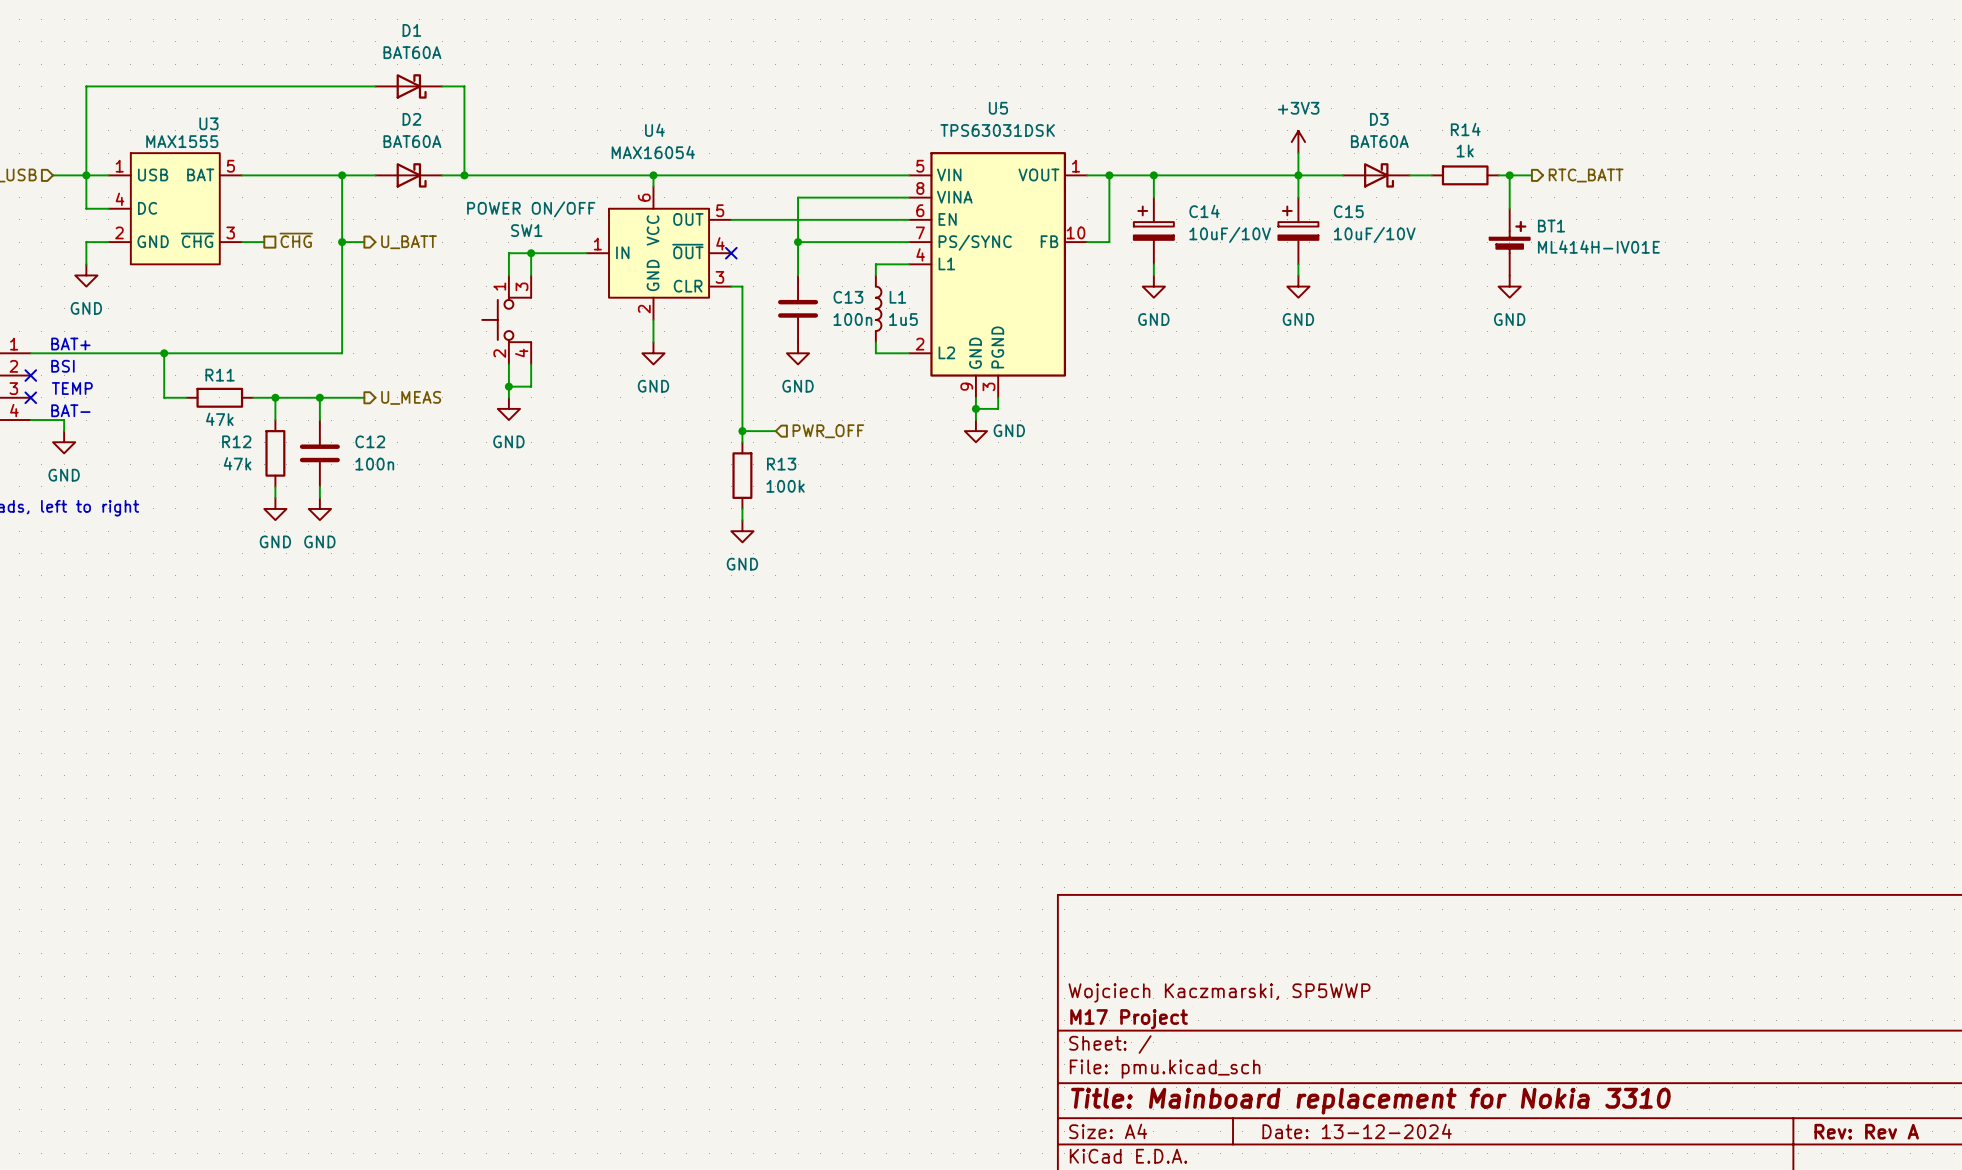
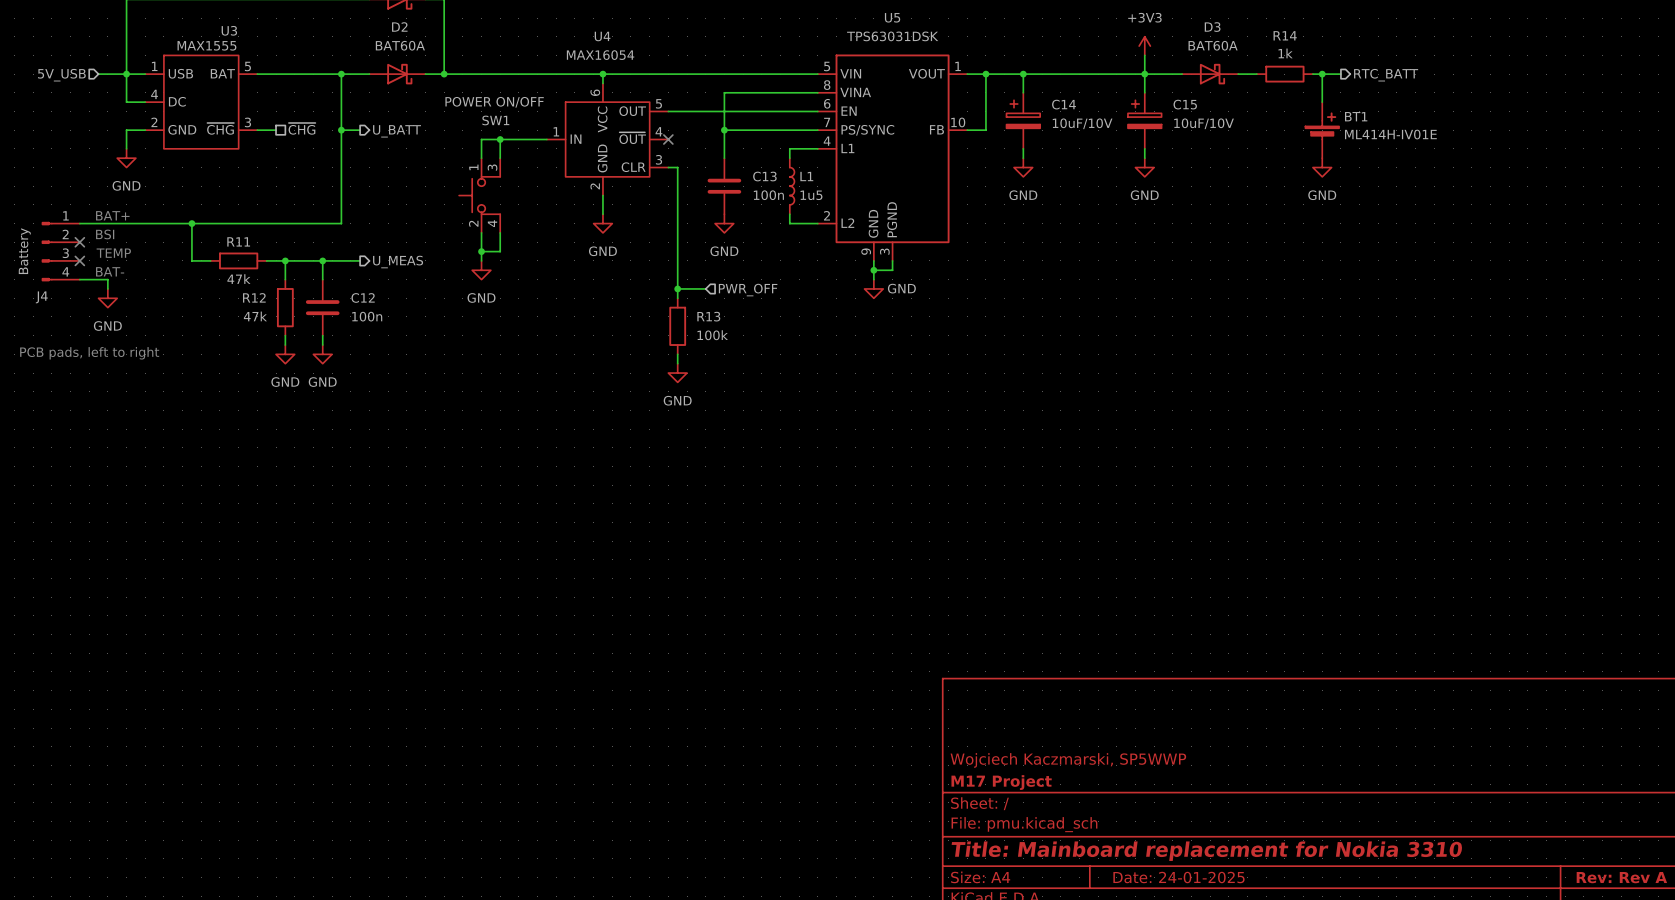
title block: Date: 13-12-2024 (1357, 1131) -> Date: 24-01-2025 (1178, 877)

